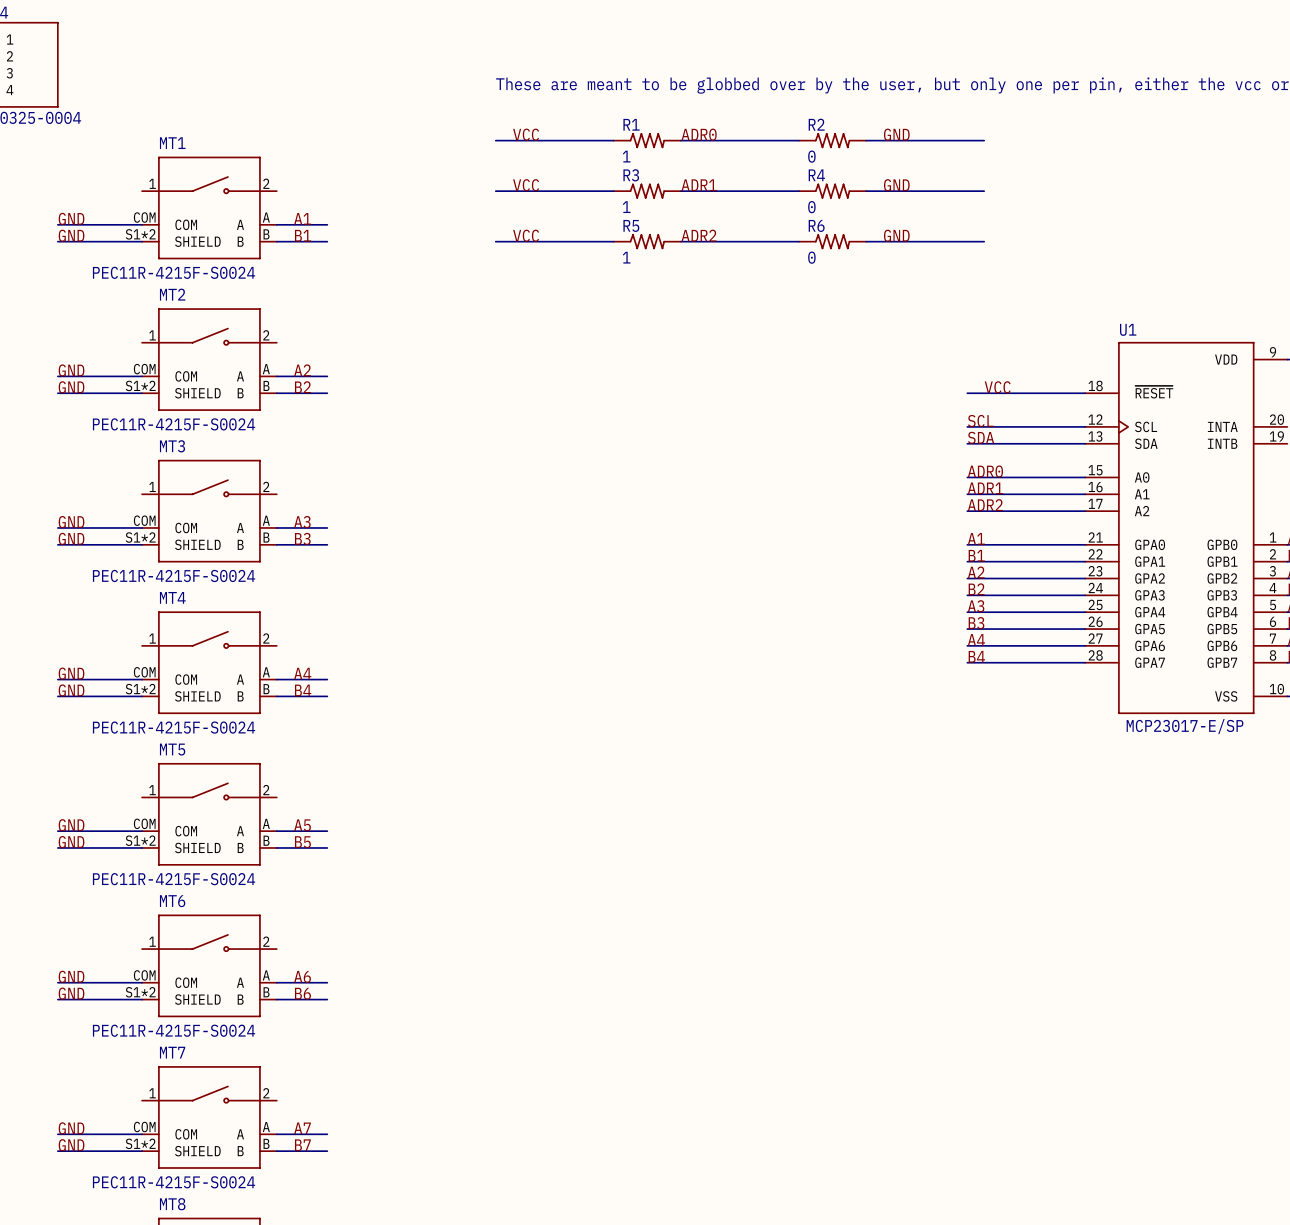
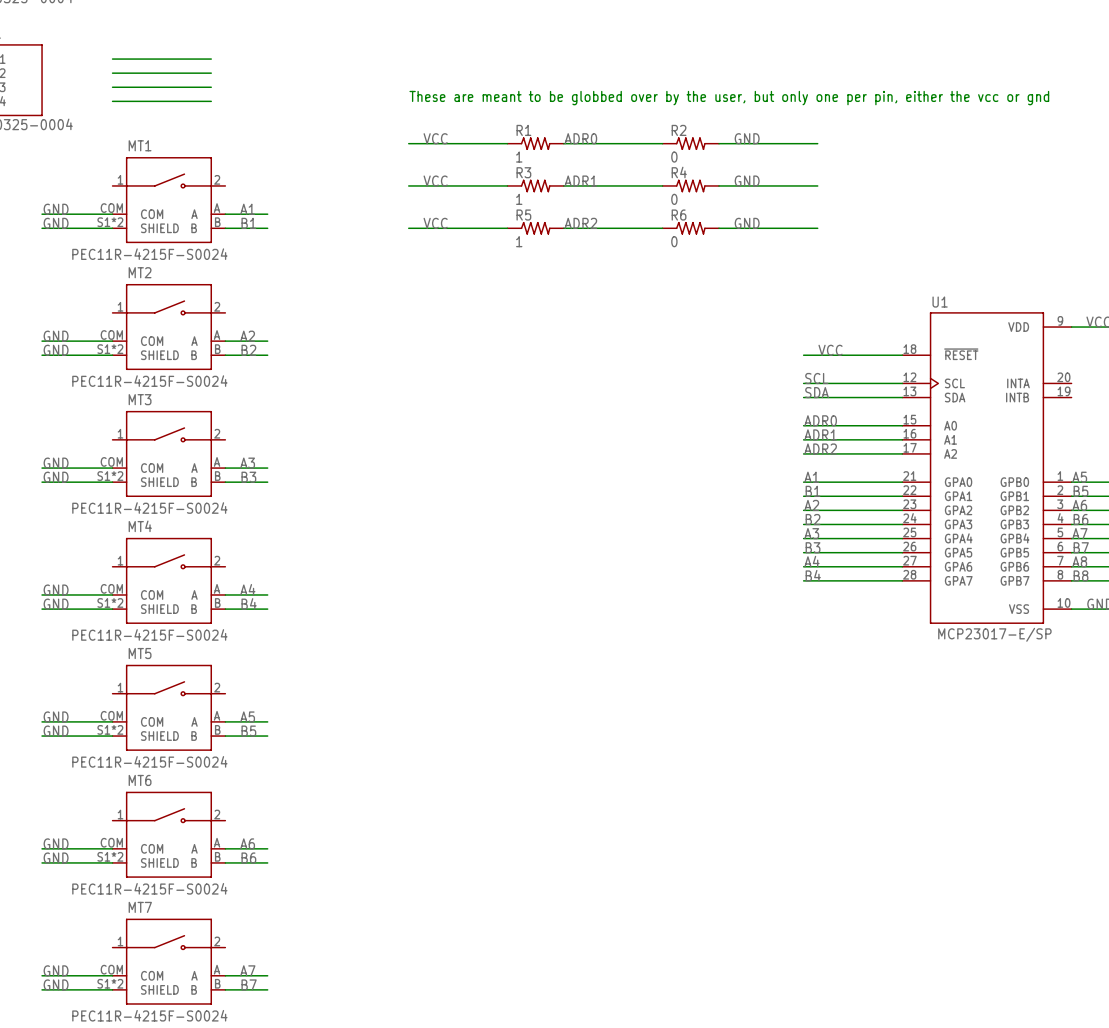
wire: none -> (112, 59) (211, 59)
wire: none -> (112, 73) (211, 73)
wire: none -> (112, 87) (211, 87)
wire: none -> (112, 101) (211, 101)

